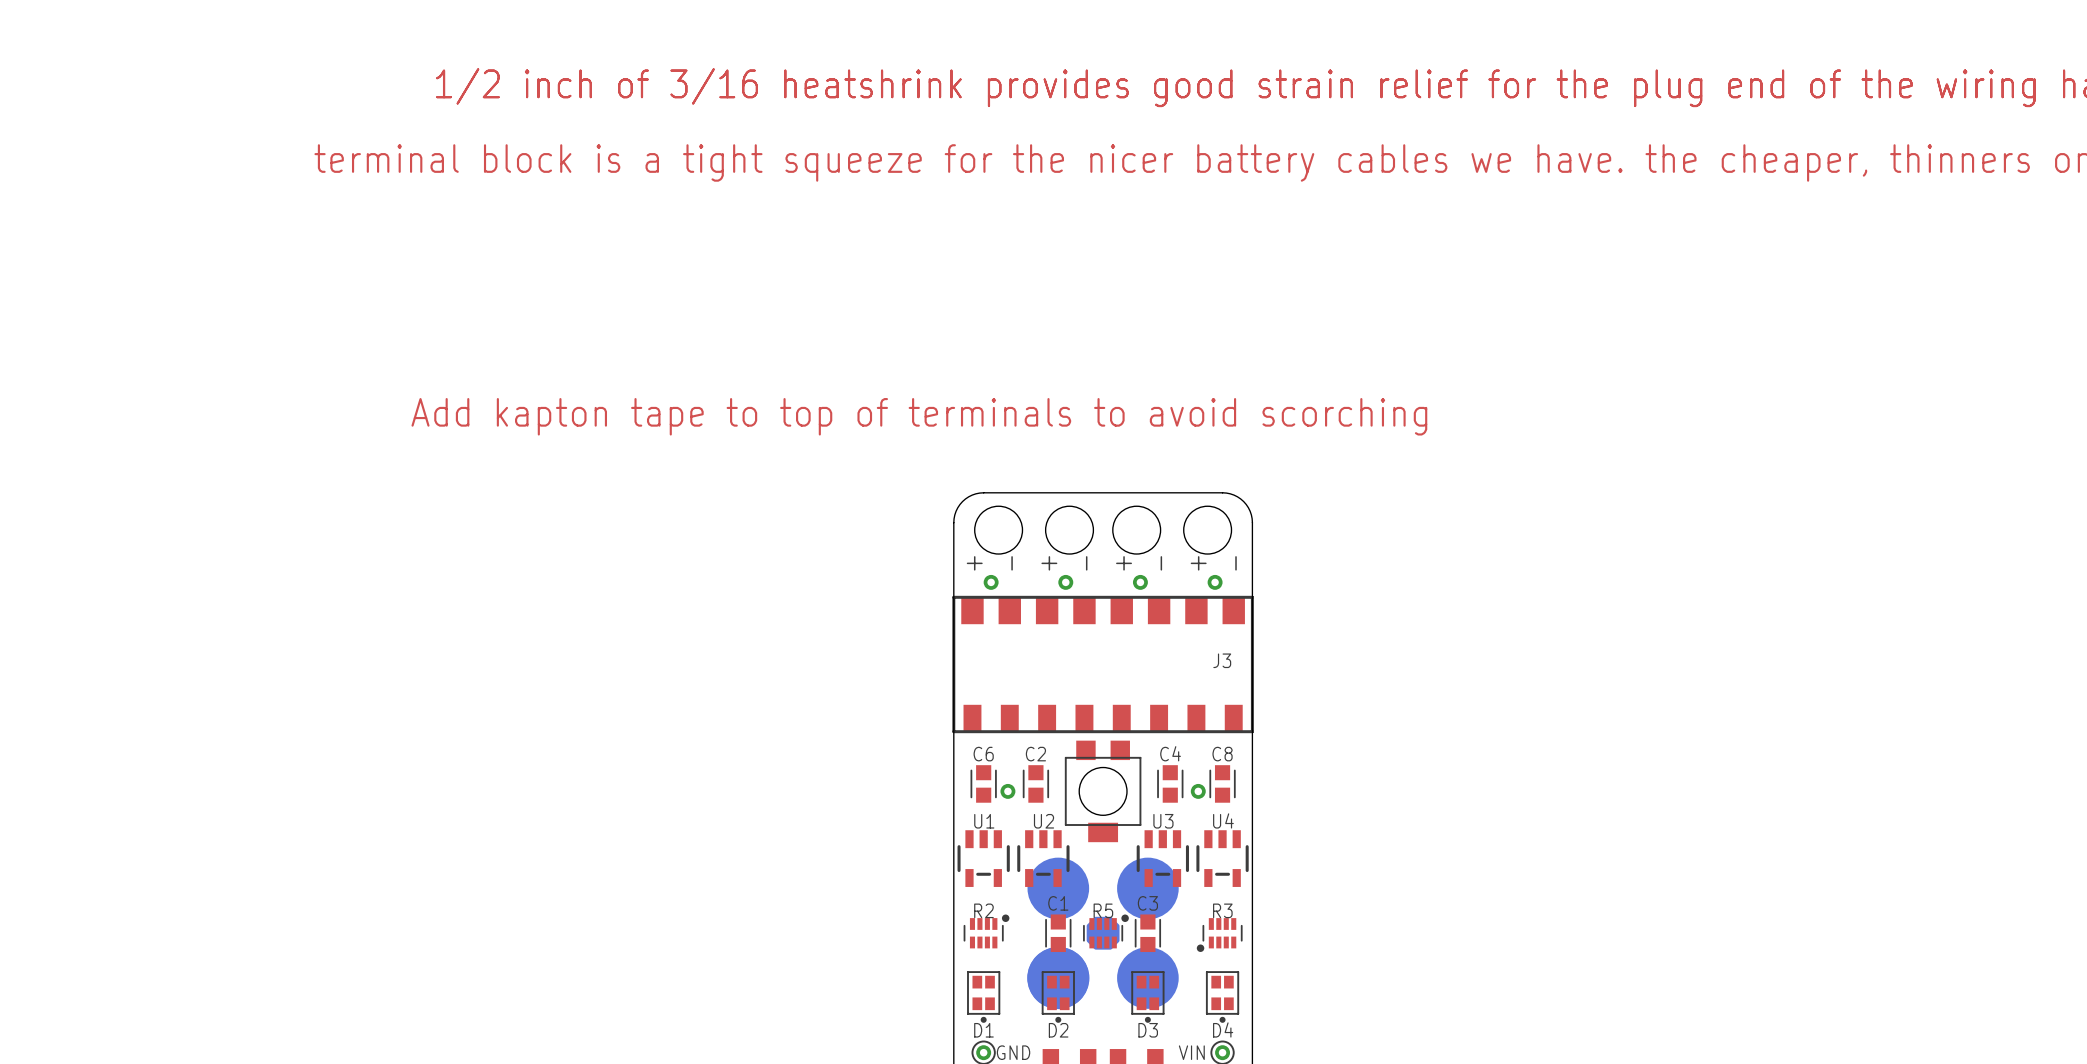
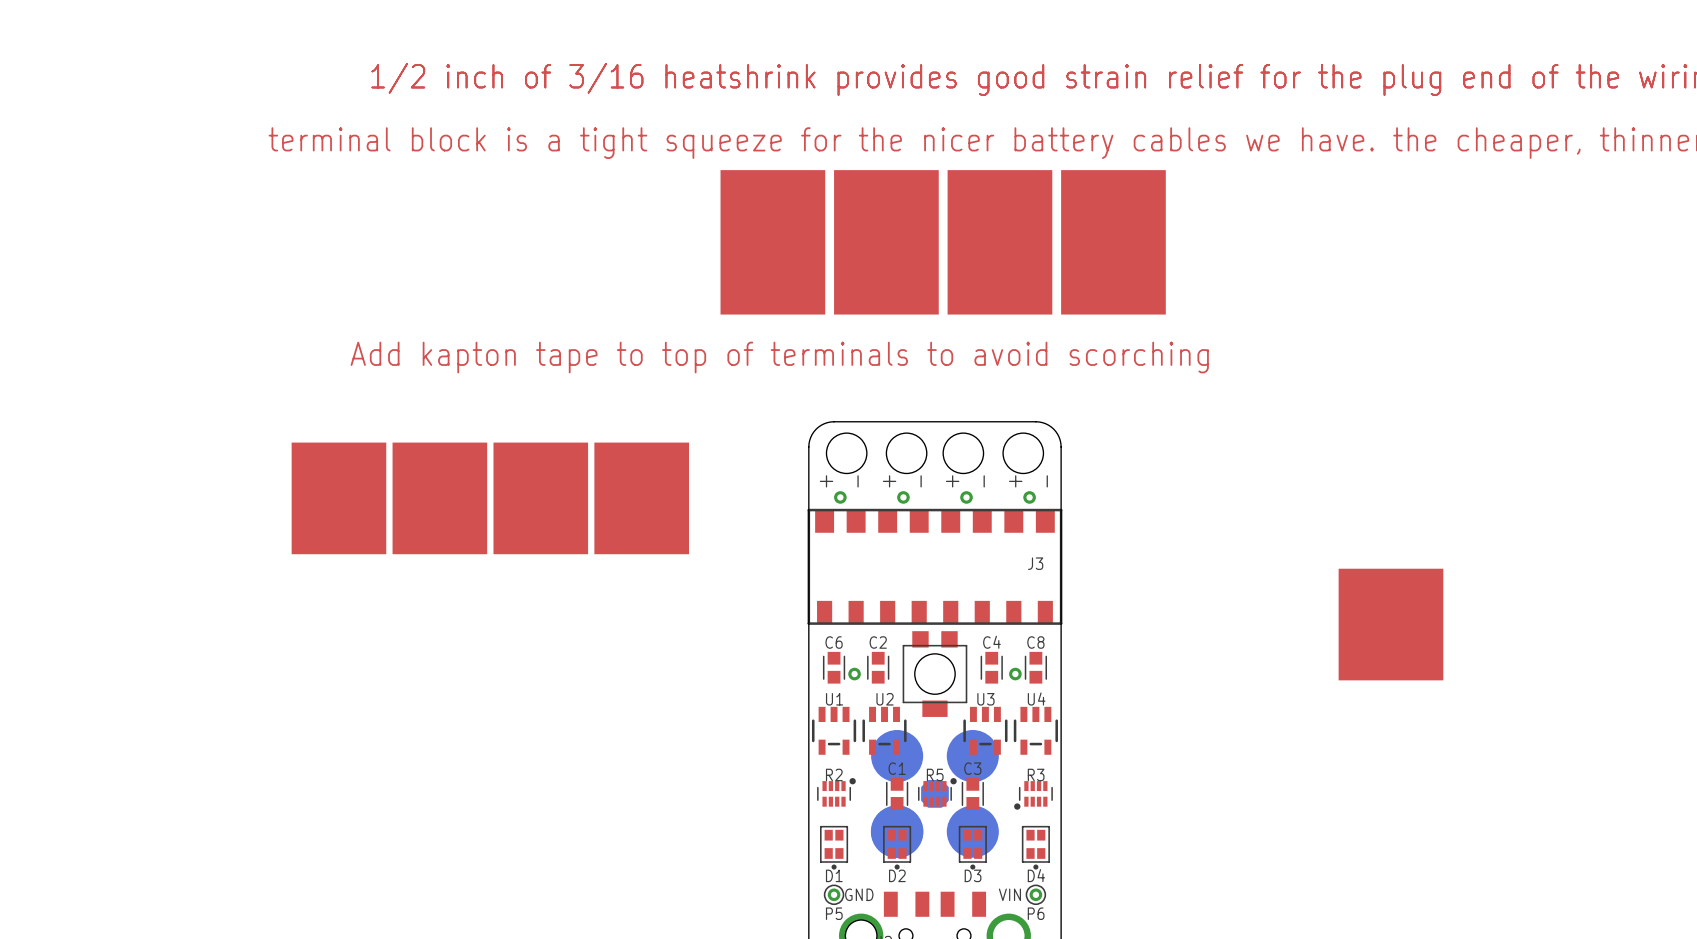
drawing: none -> [720, 170, 1166, 315]
drawing: none -> [291, 442, 689, 555]
drawing: none -> [1338, 568, 1444, 681]

